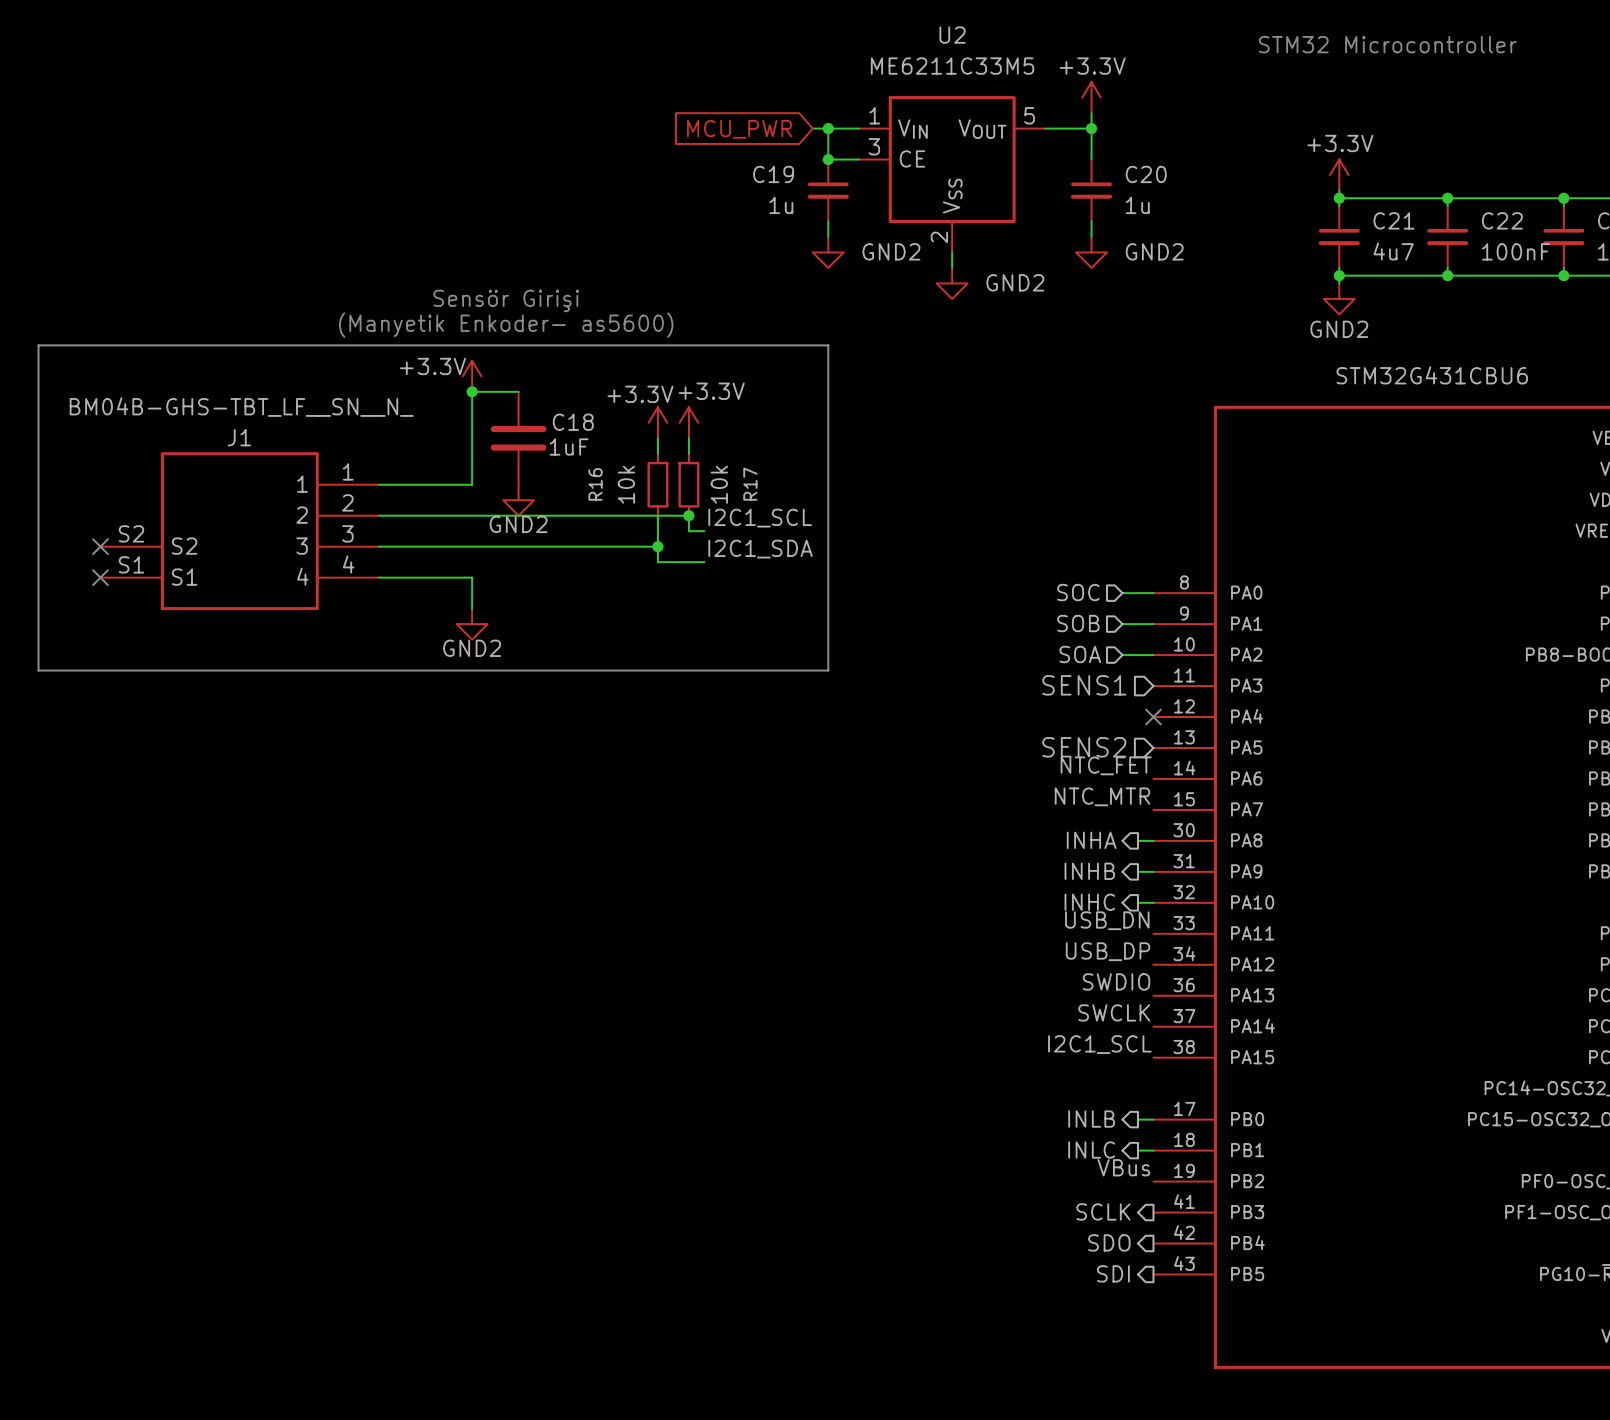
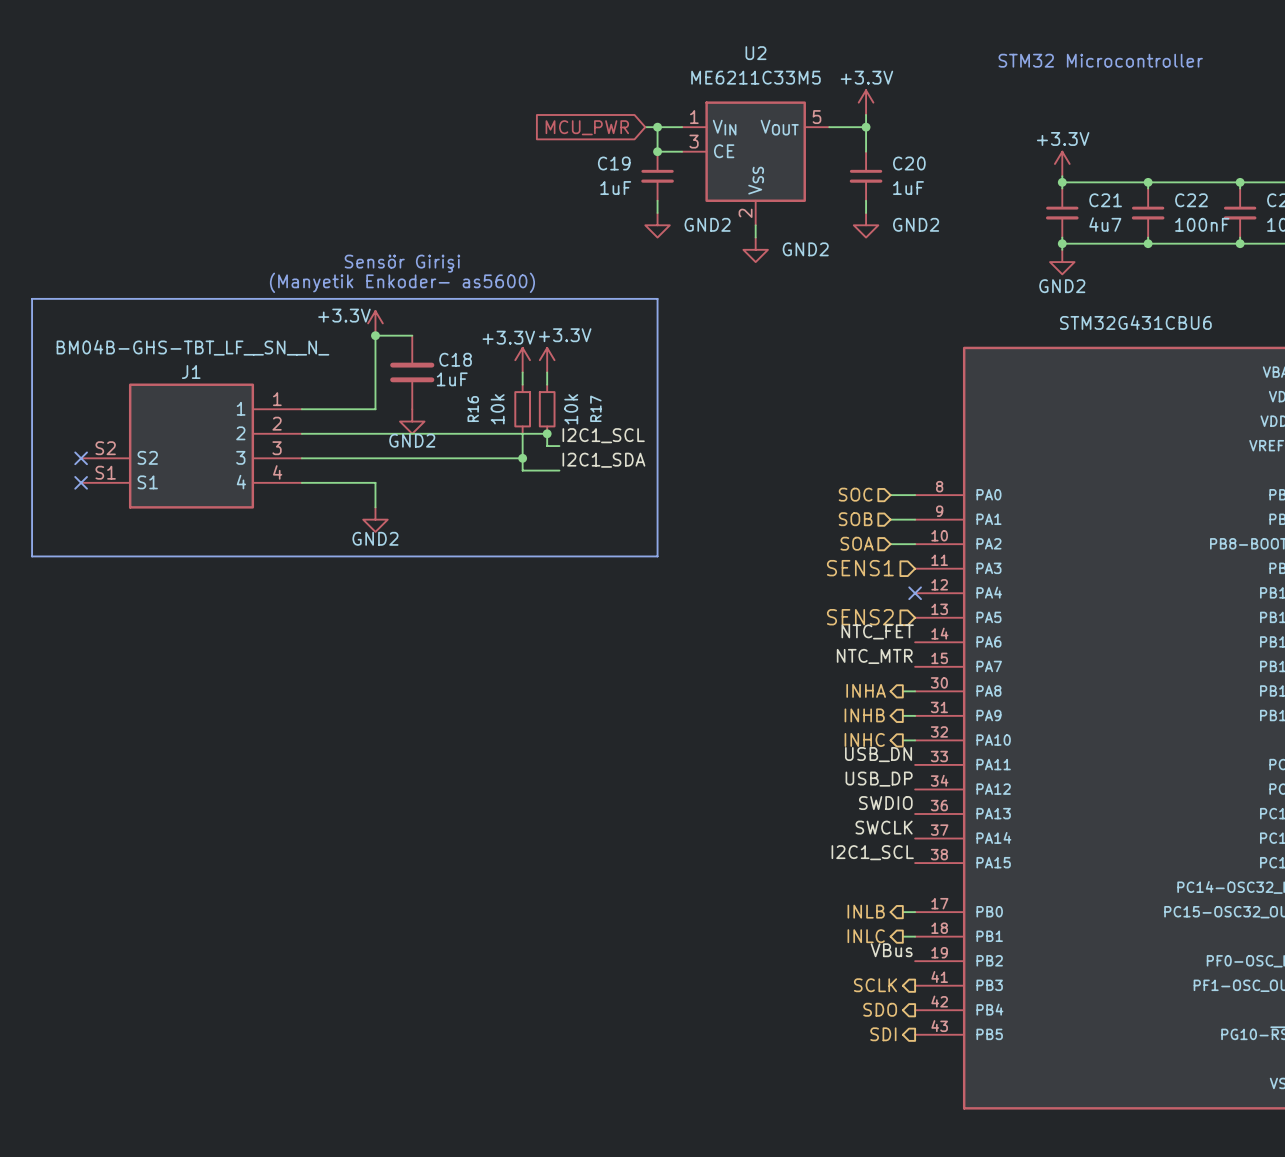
C19 value: 1u (781, 205) -> 1uF (615, 188)
C20 value: 1u (1137, 205) -> 1uF (908, 188)

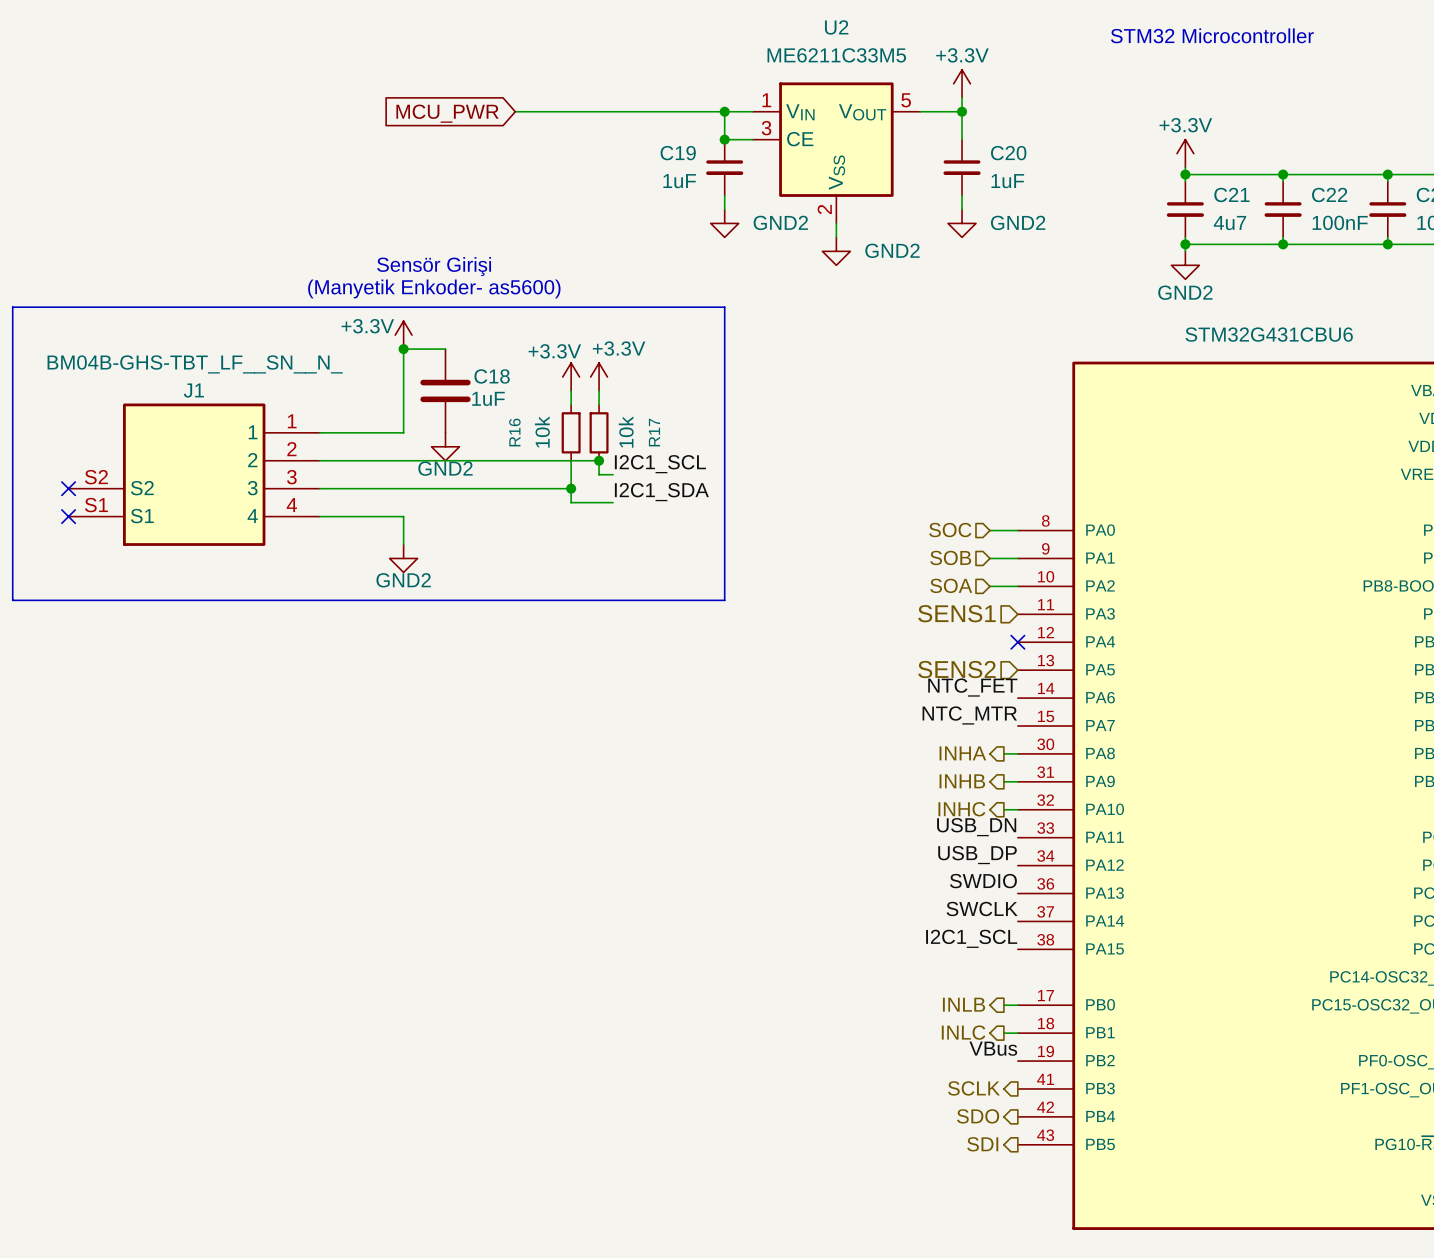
wire: none -> (515, 111) (710, 111)
global label position: MCU_PWR (587, 127) -> MCU_PWR (447, 113)

